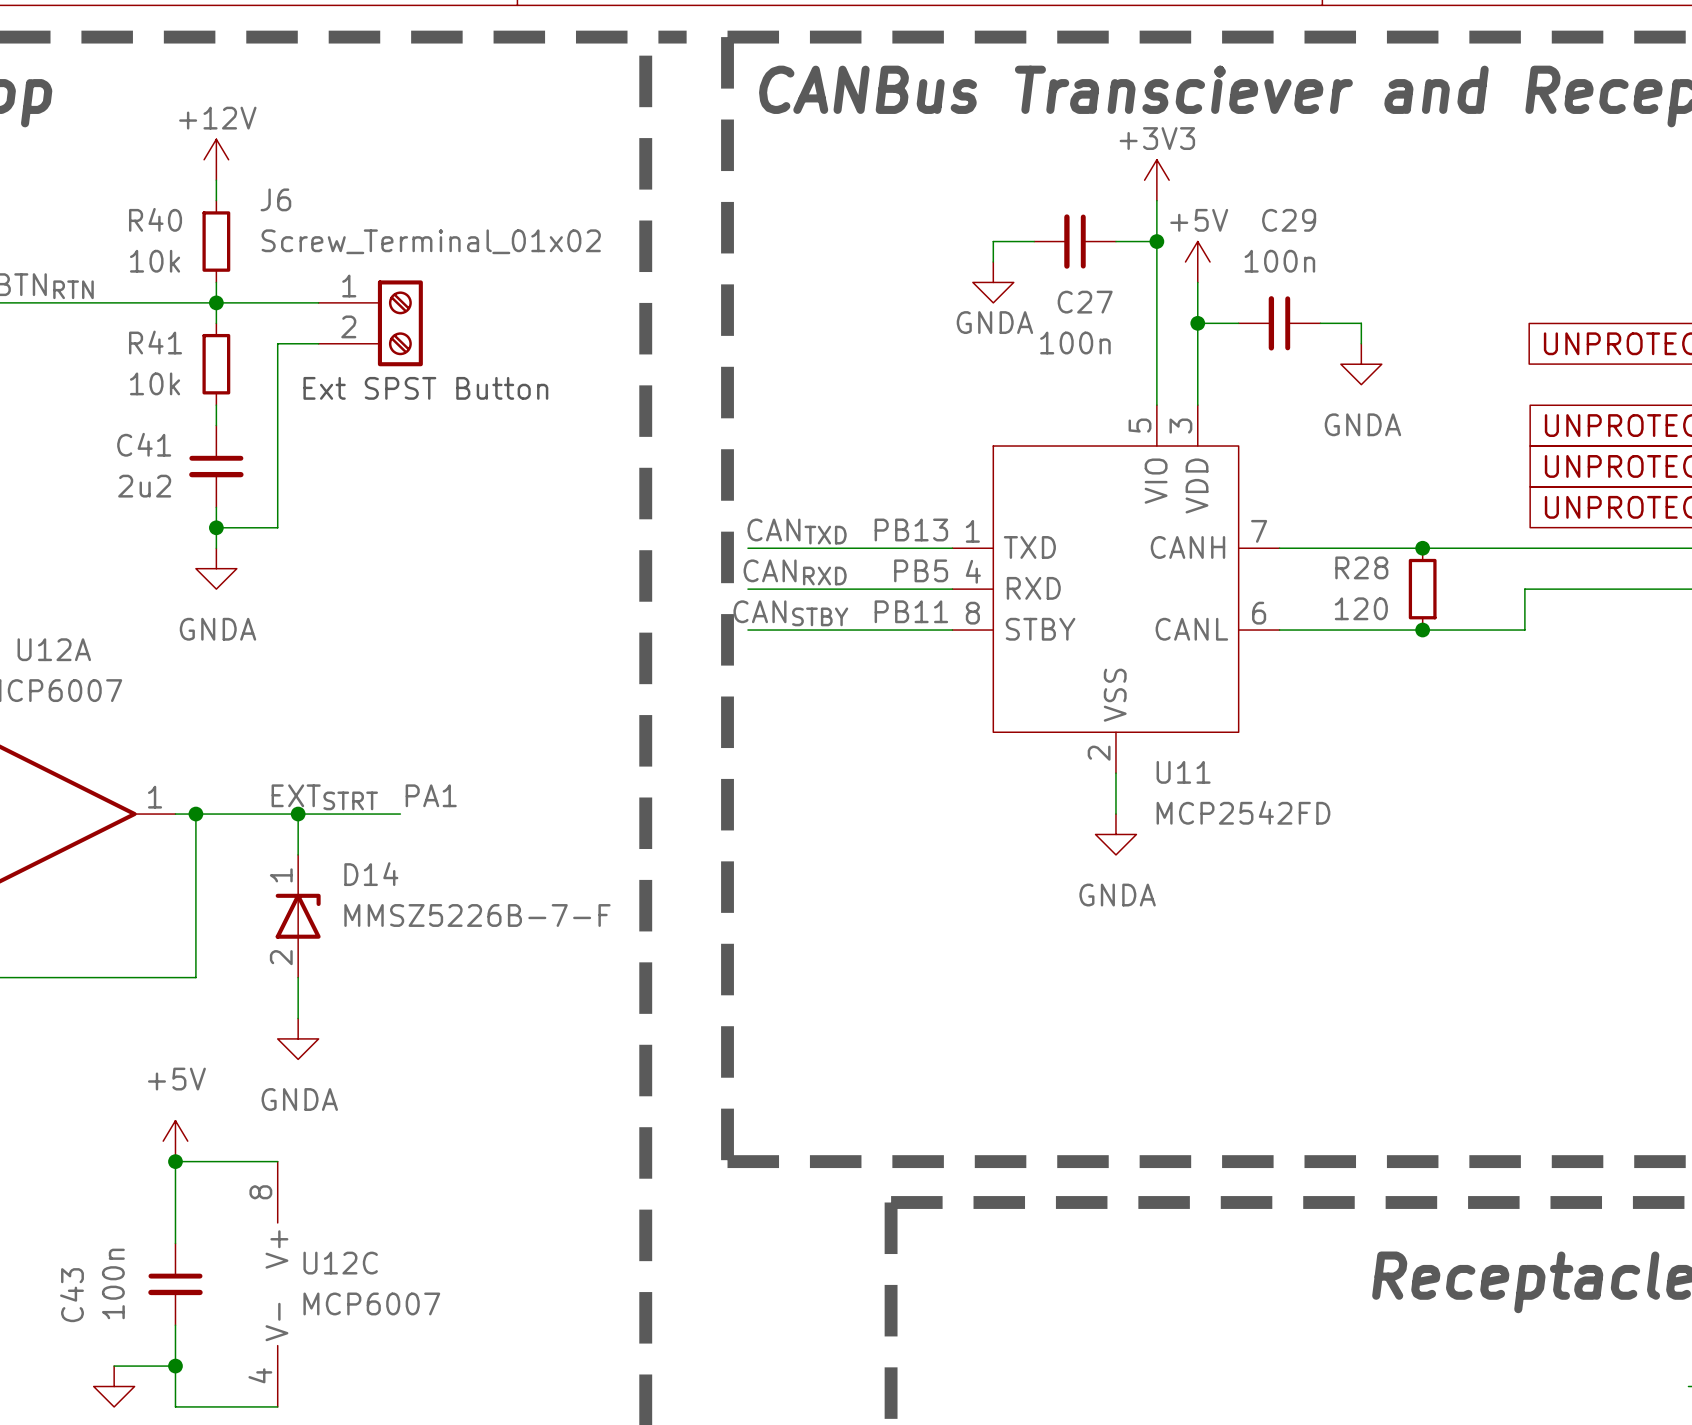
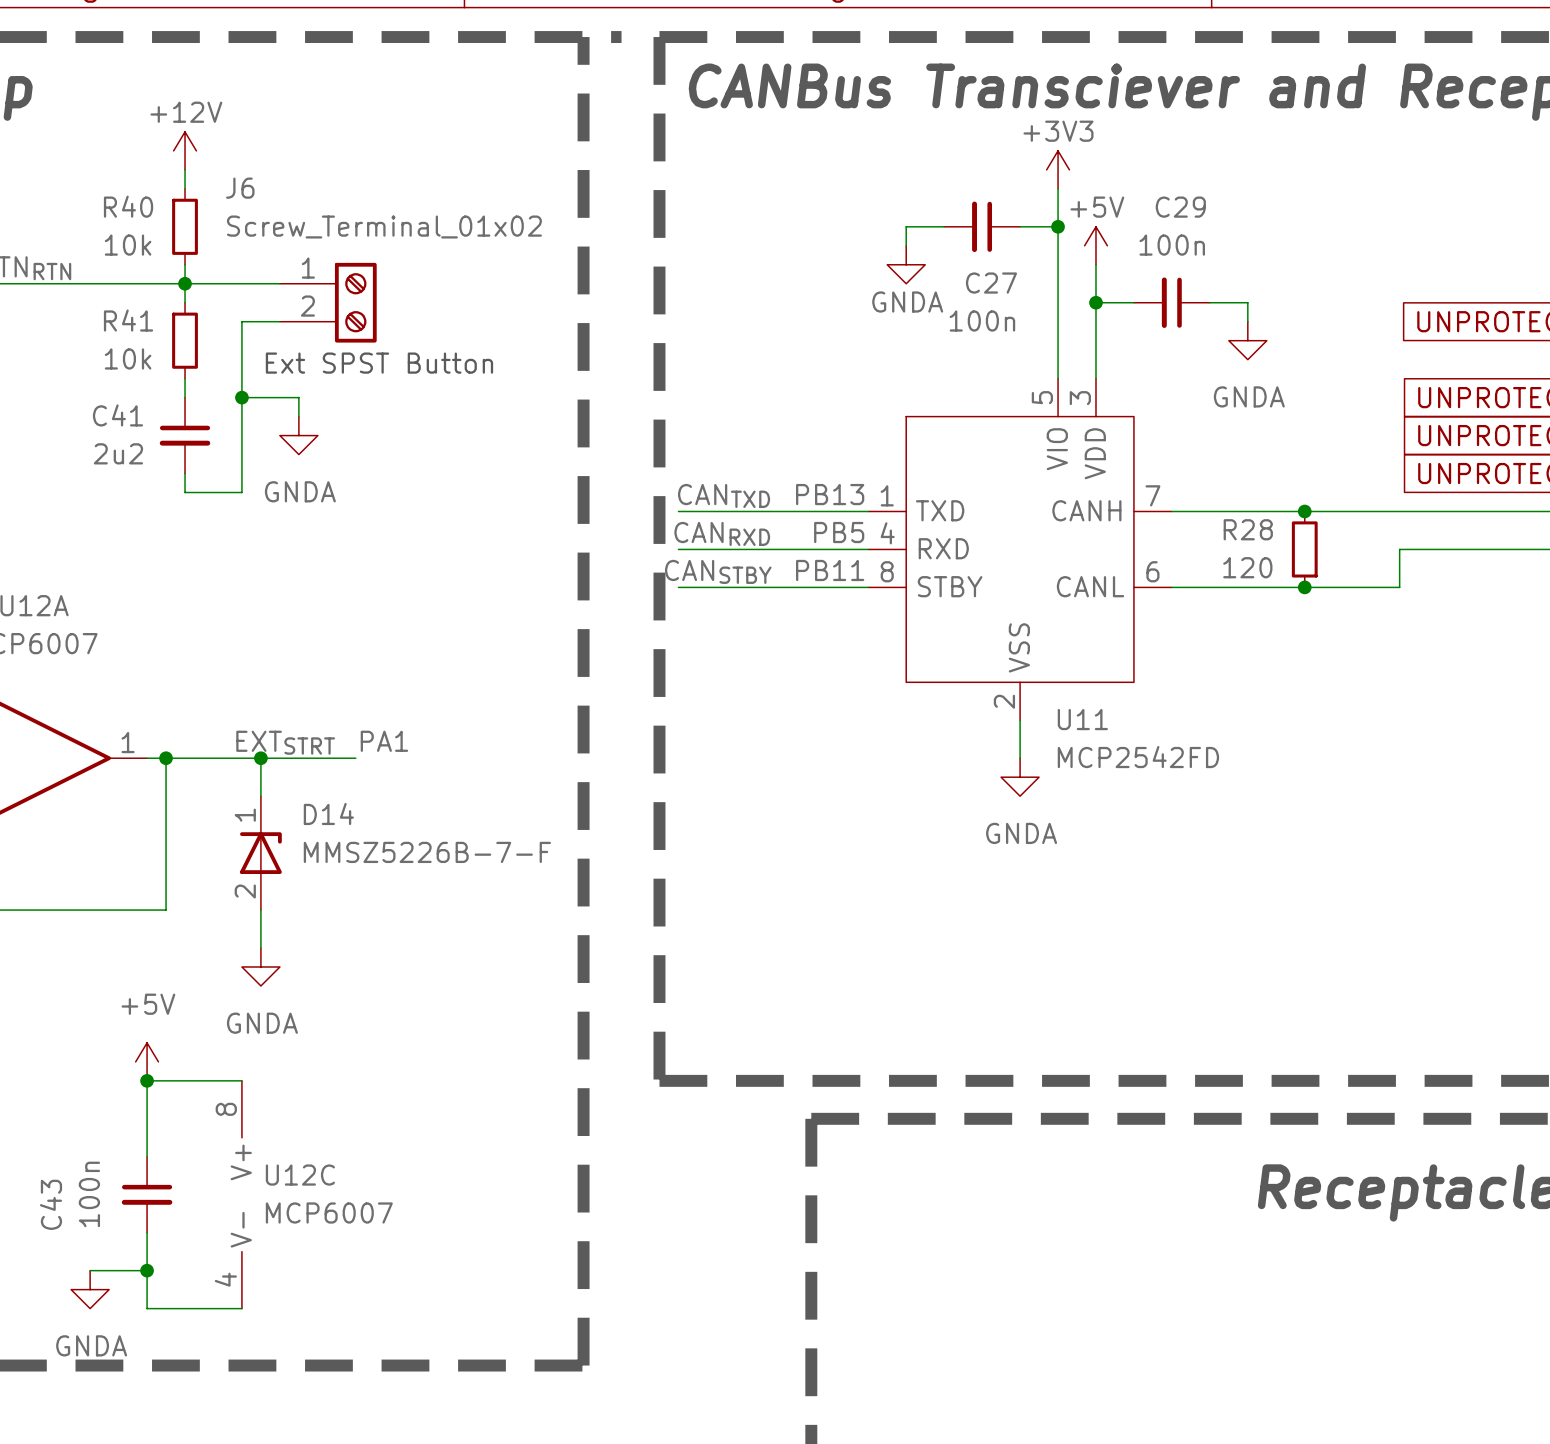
wire: none -> (241, 397) (298, 397) (298, 416)
junction: none -> (241, 397)
wire: (216, 527) (216, 548) -> none
junction: (216, 527) -> none
power symbol position: GNDA (216, 568) -> GNDA (298, 435)

